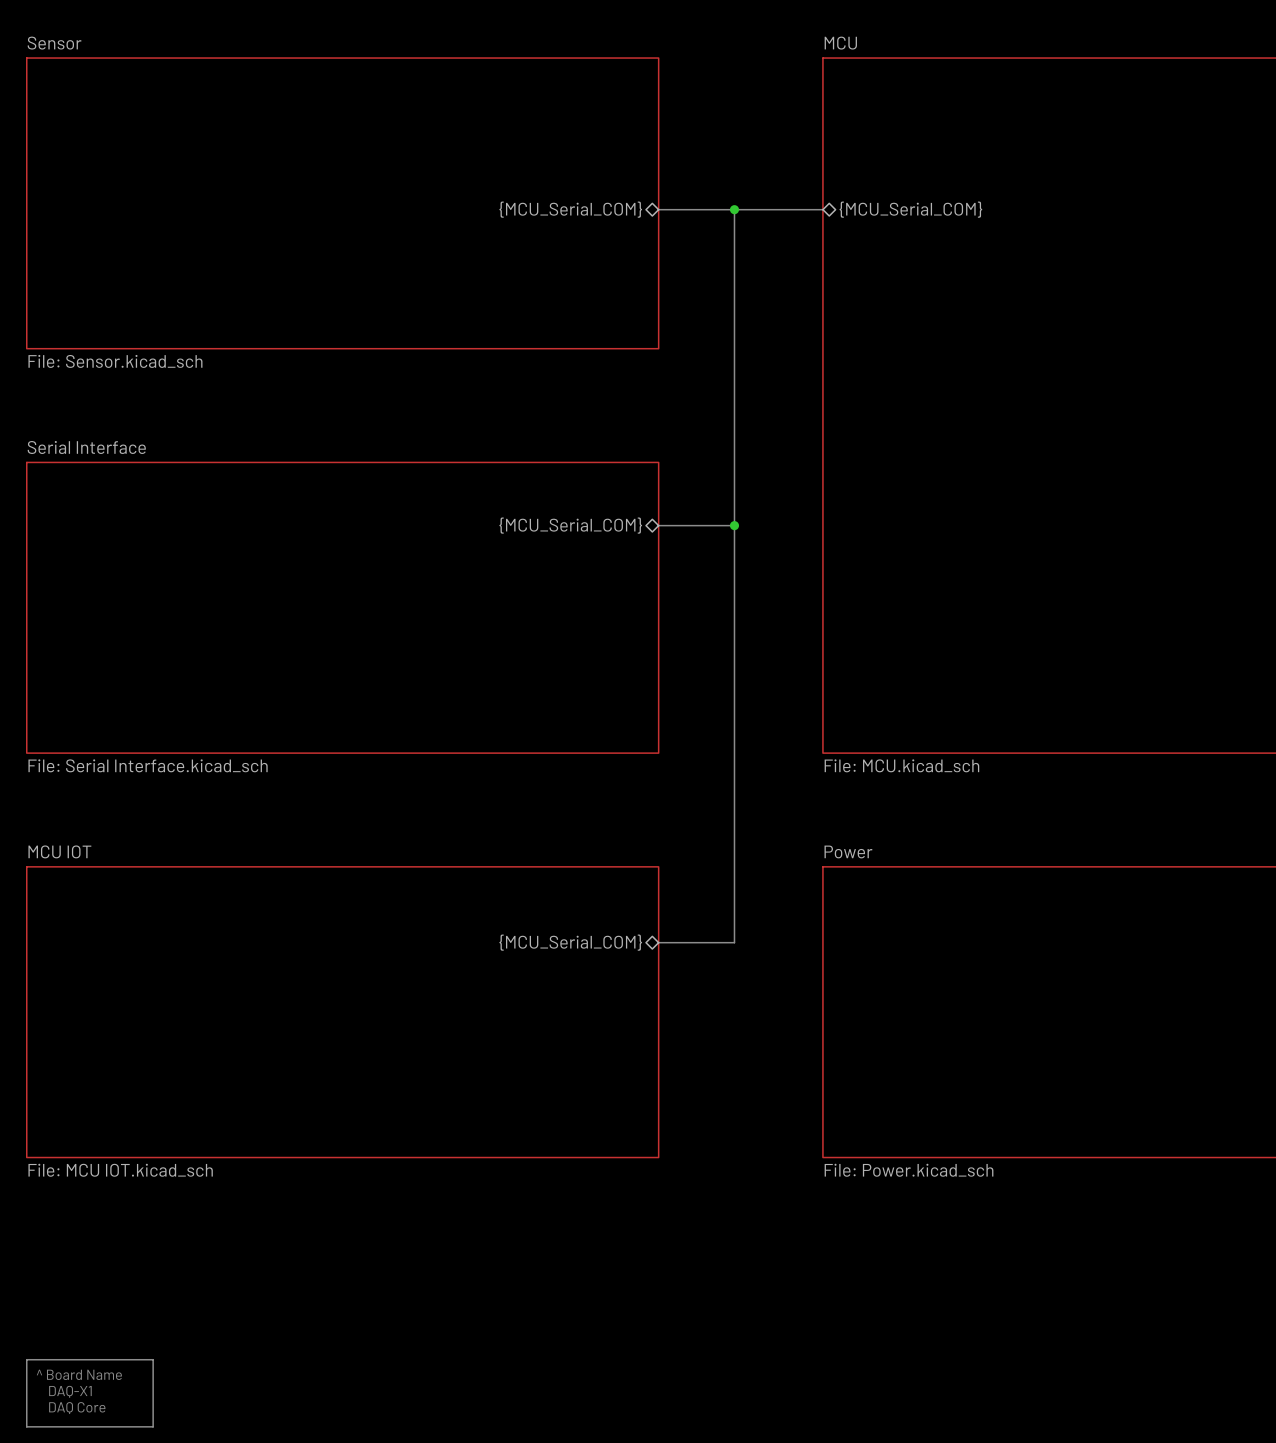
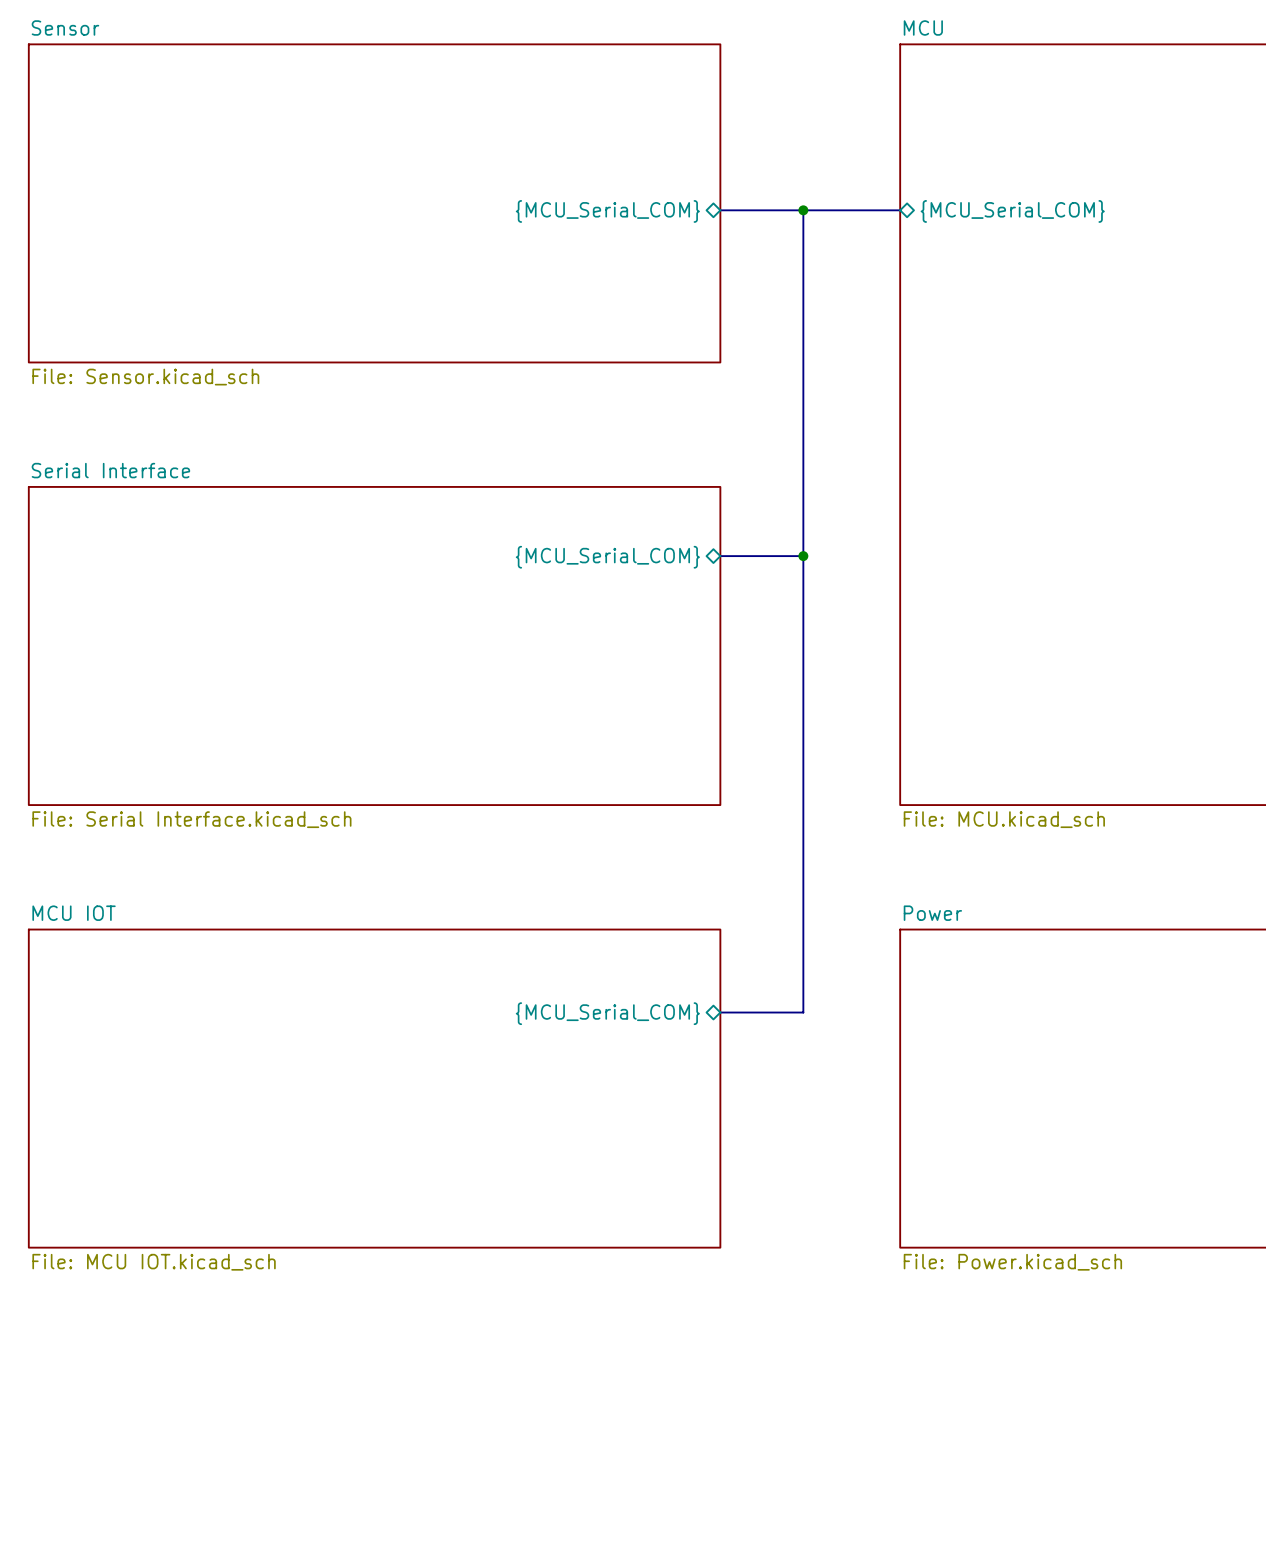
line: (26, 1359) (153, 1359) (153, 1426) (26, 1426) (26, 1359) -> none
text: ^ Board Name (79, 1374) -> none
text: DAQ-X1 (70, 1391) -> none
text: DAQ Core (77, 1408) -> none

